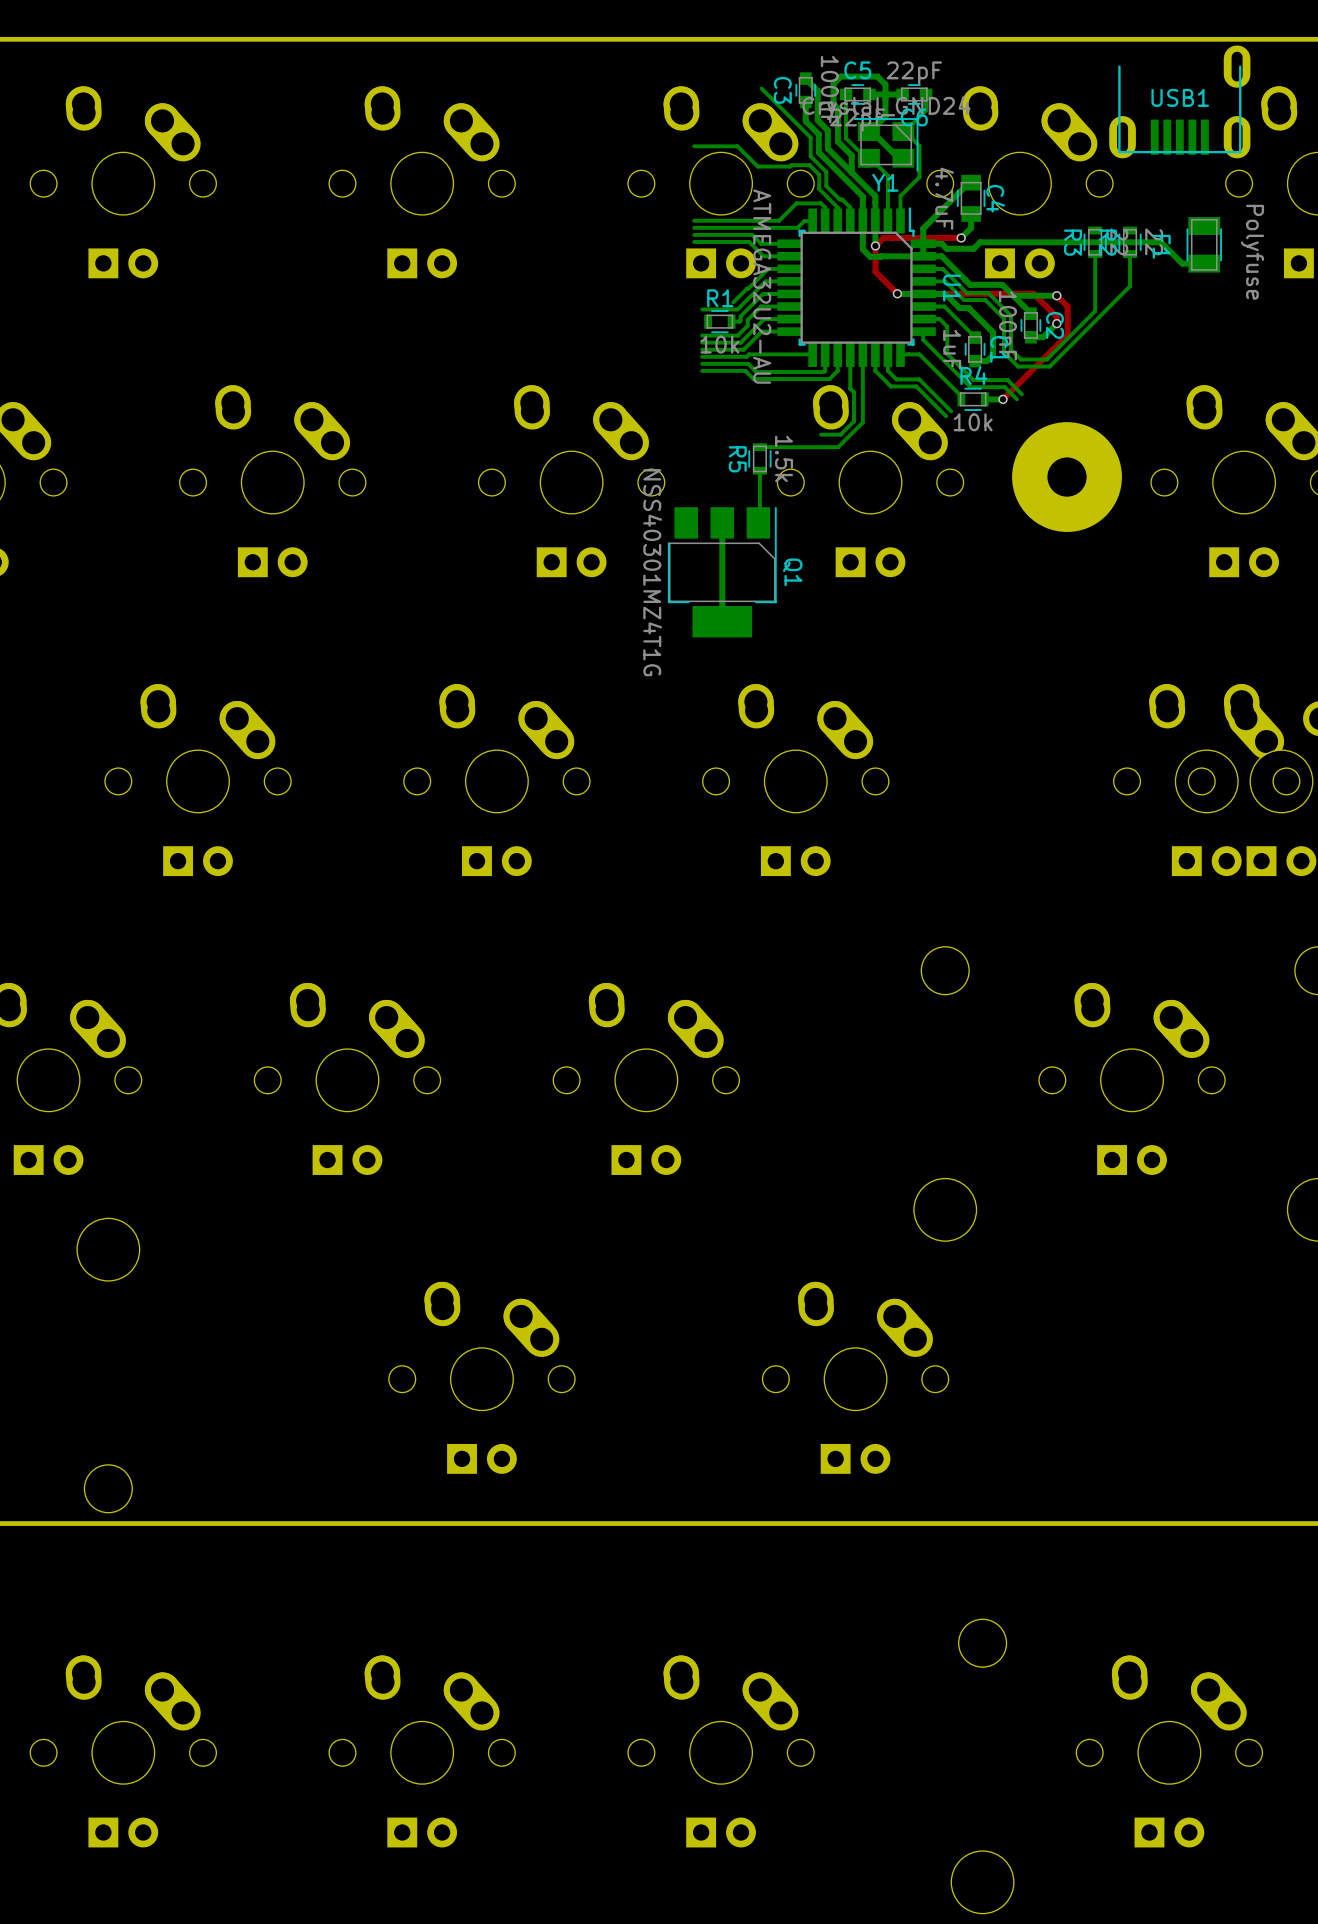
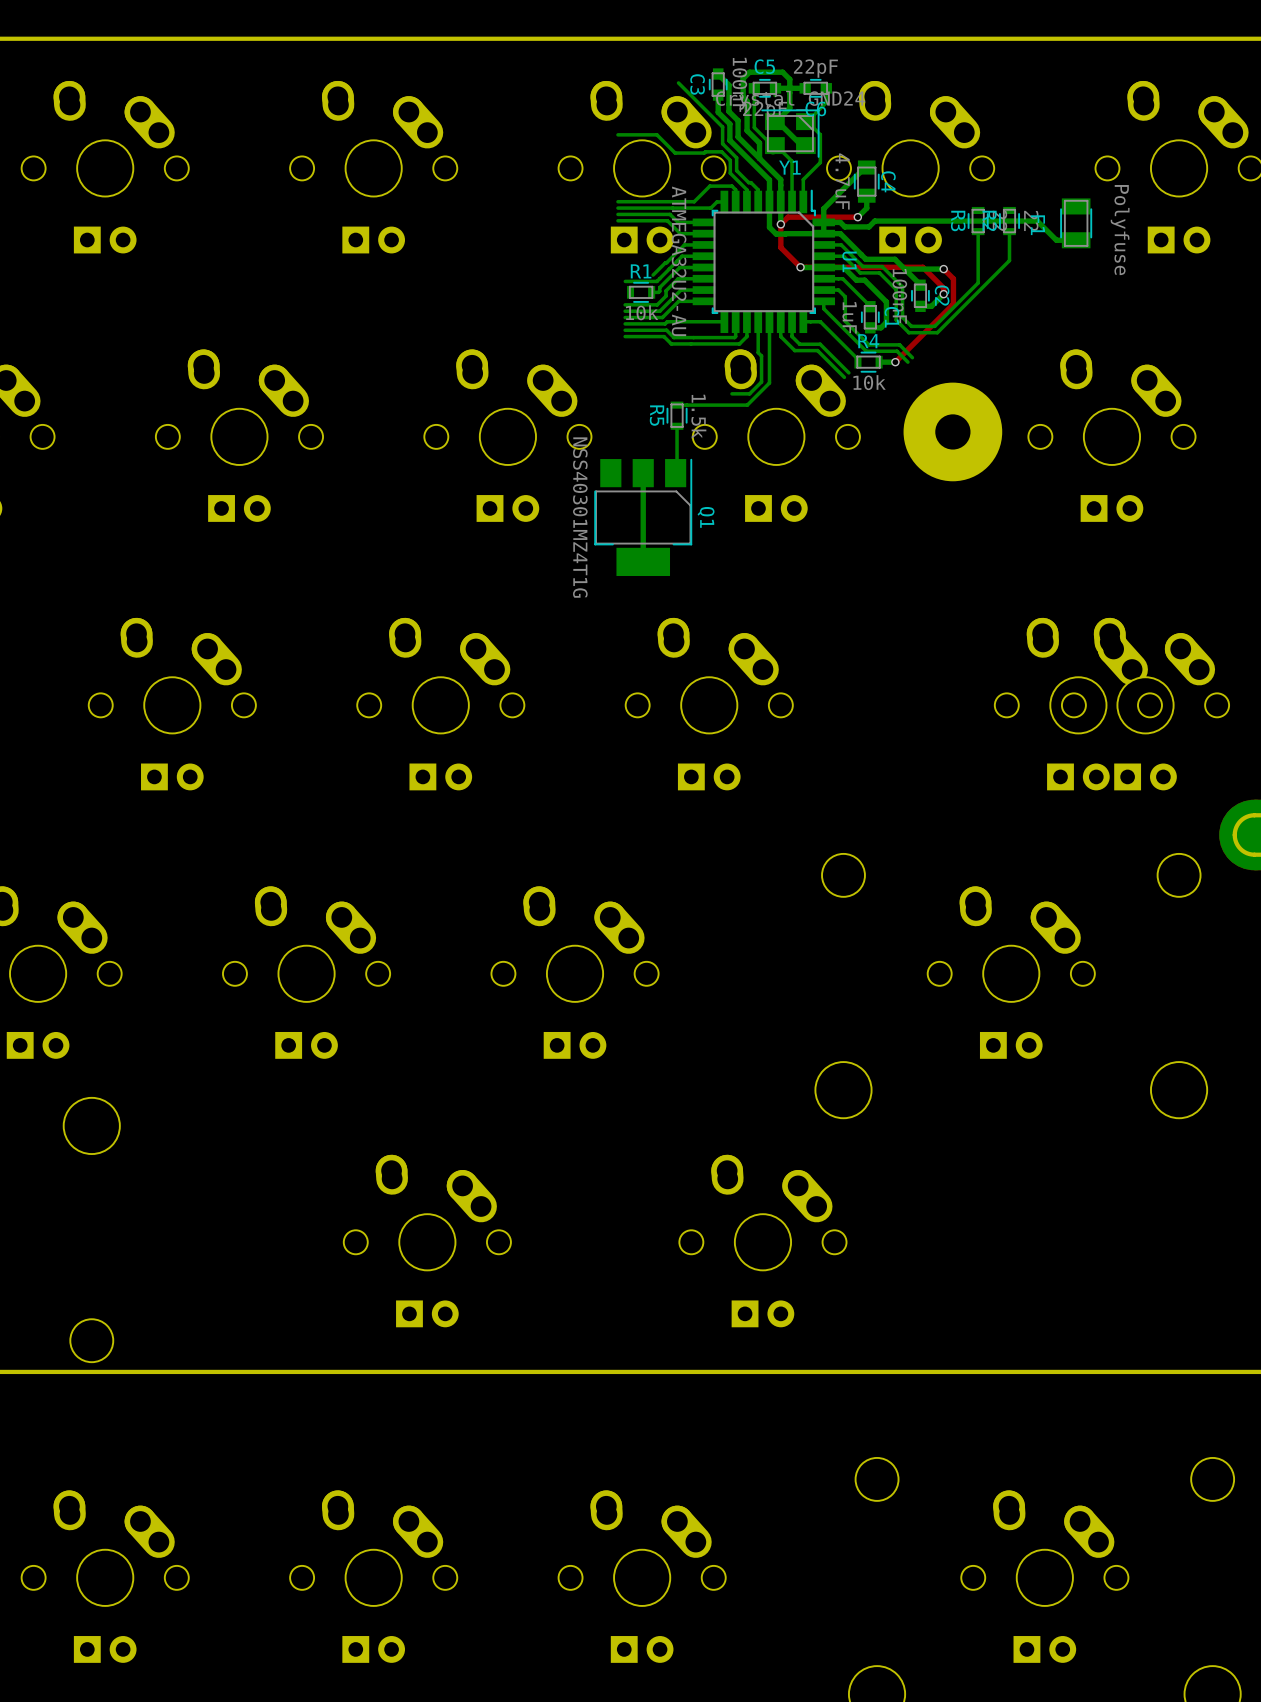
USB1: (1179, 101) -> none

